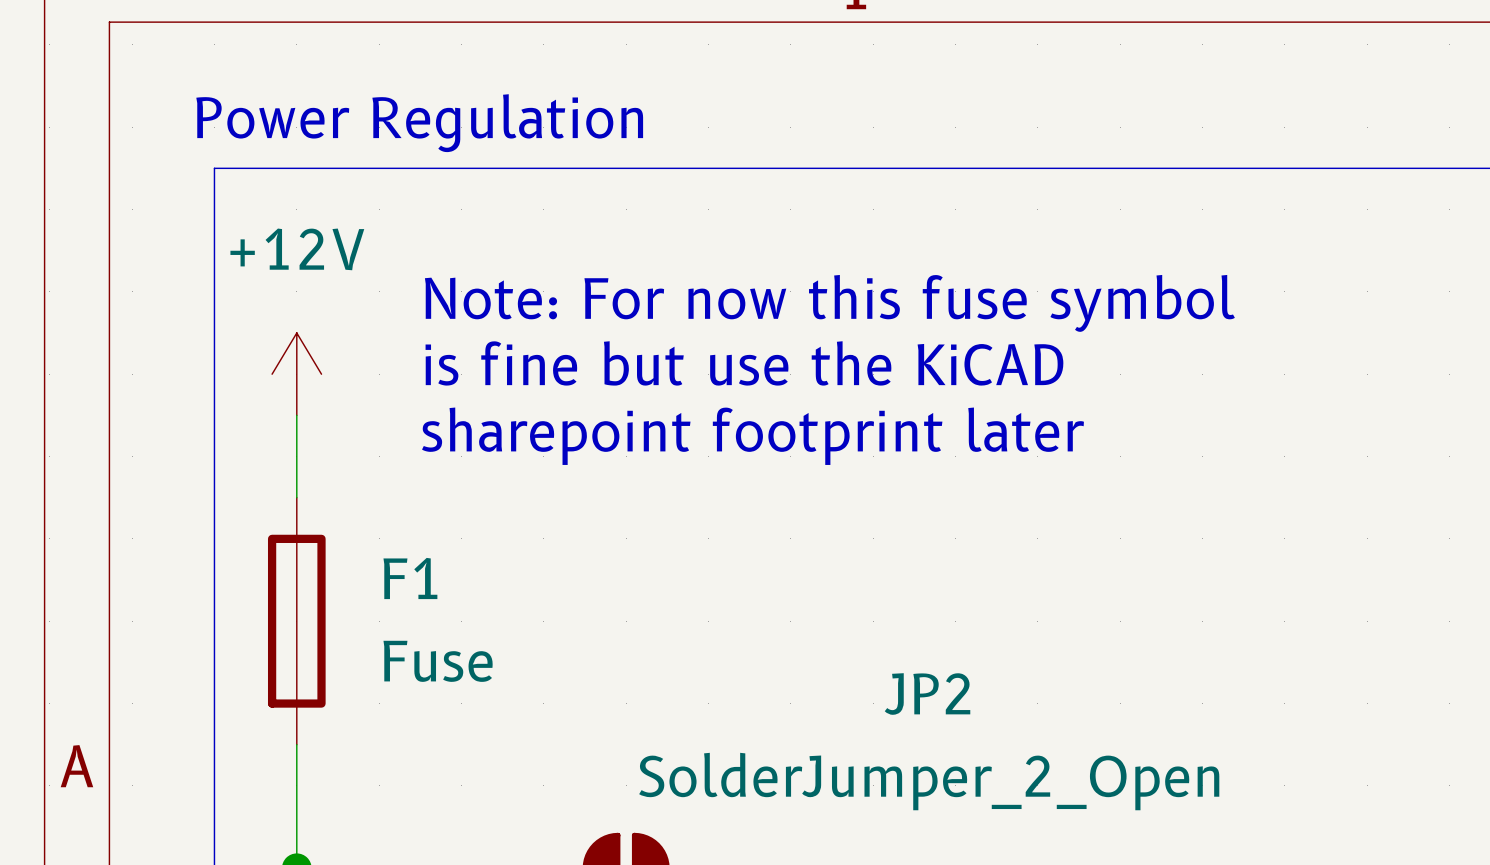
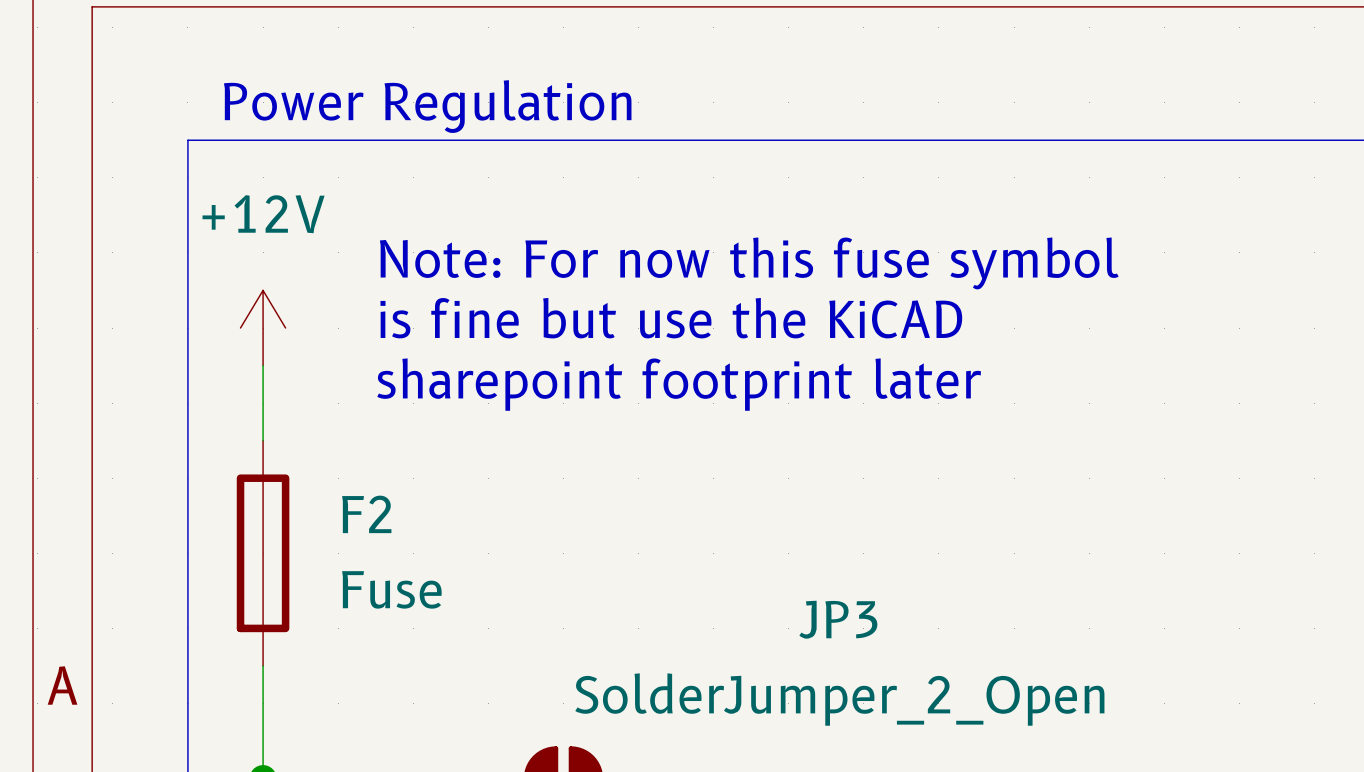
text position: Power Regulation (419, 123) -> Power Regulation (427, 106)
F1 name: F1 (410, 578) -> F2 (366, 514)
JP2 name: JP2 (927, 694) -> JP3 (838, 619)

